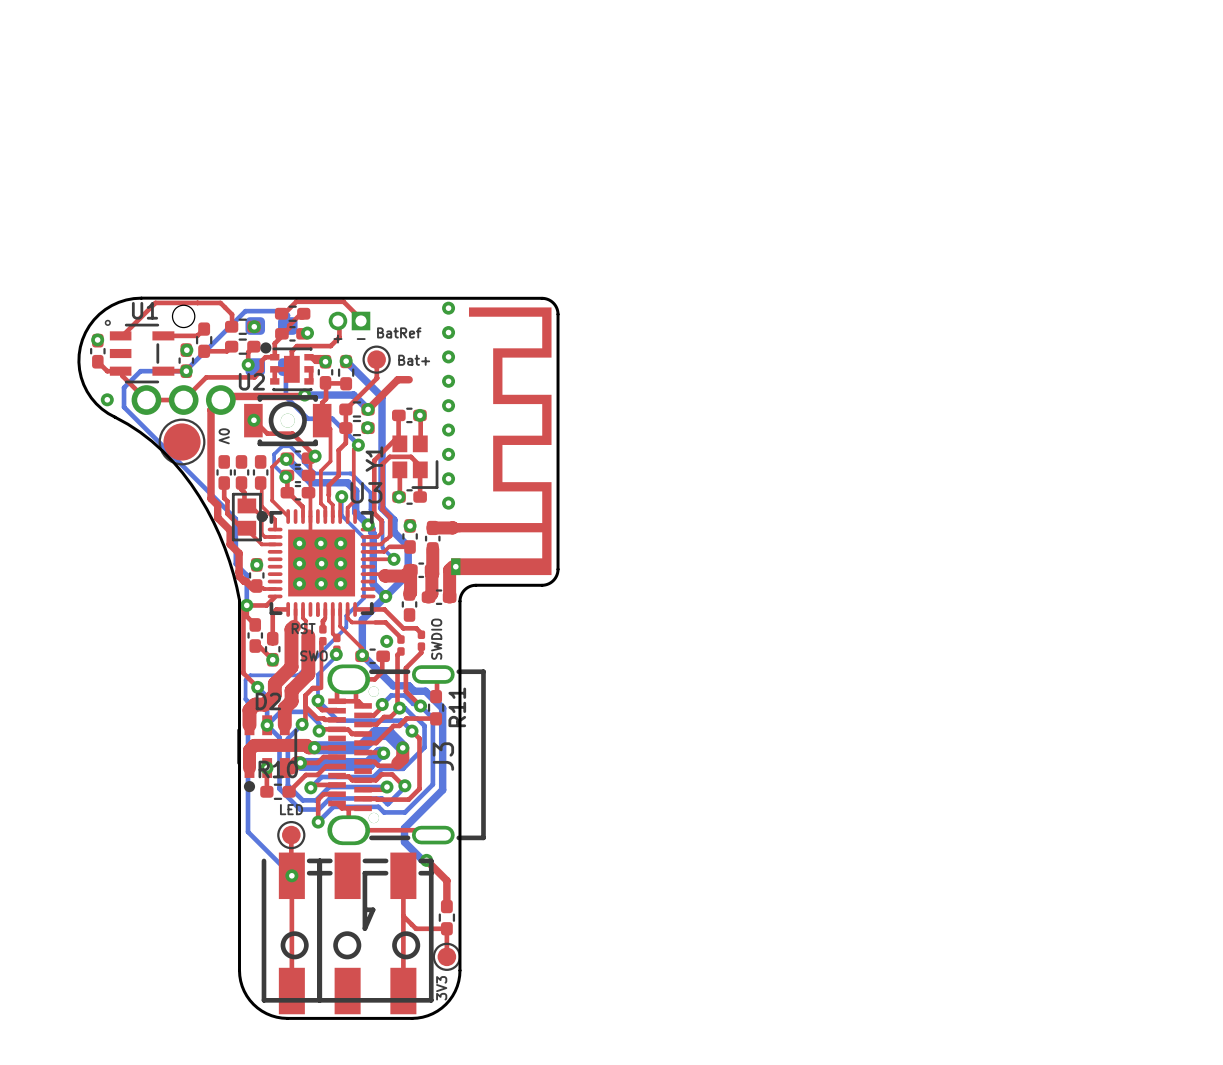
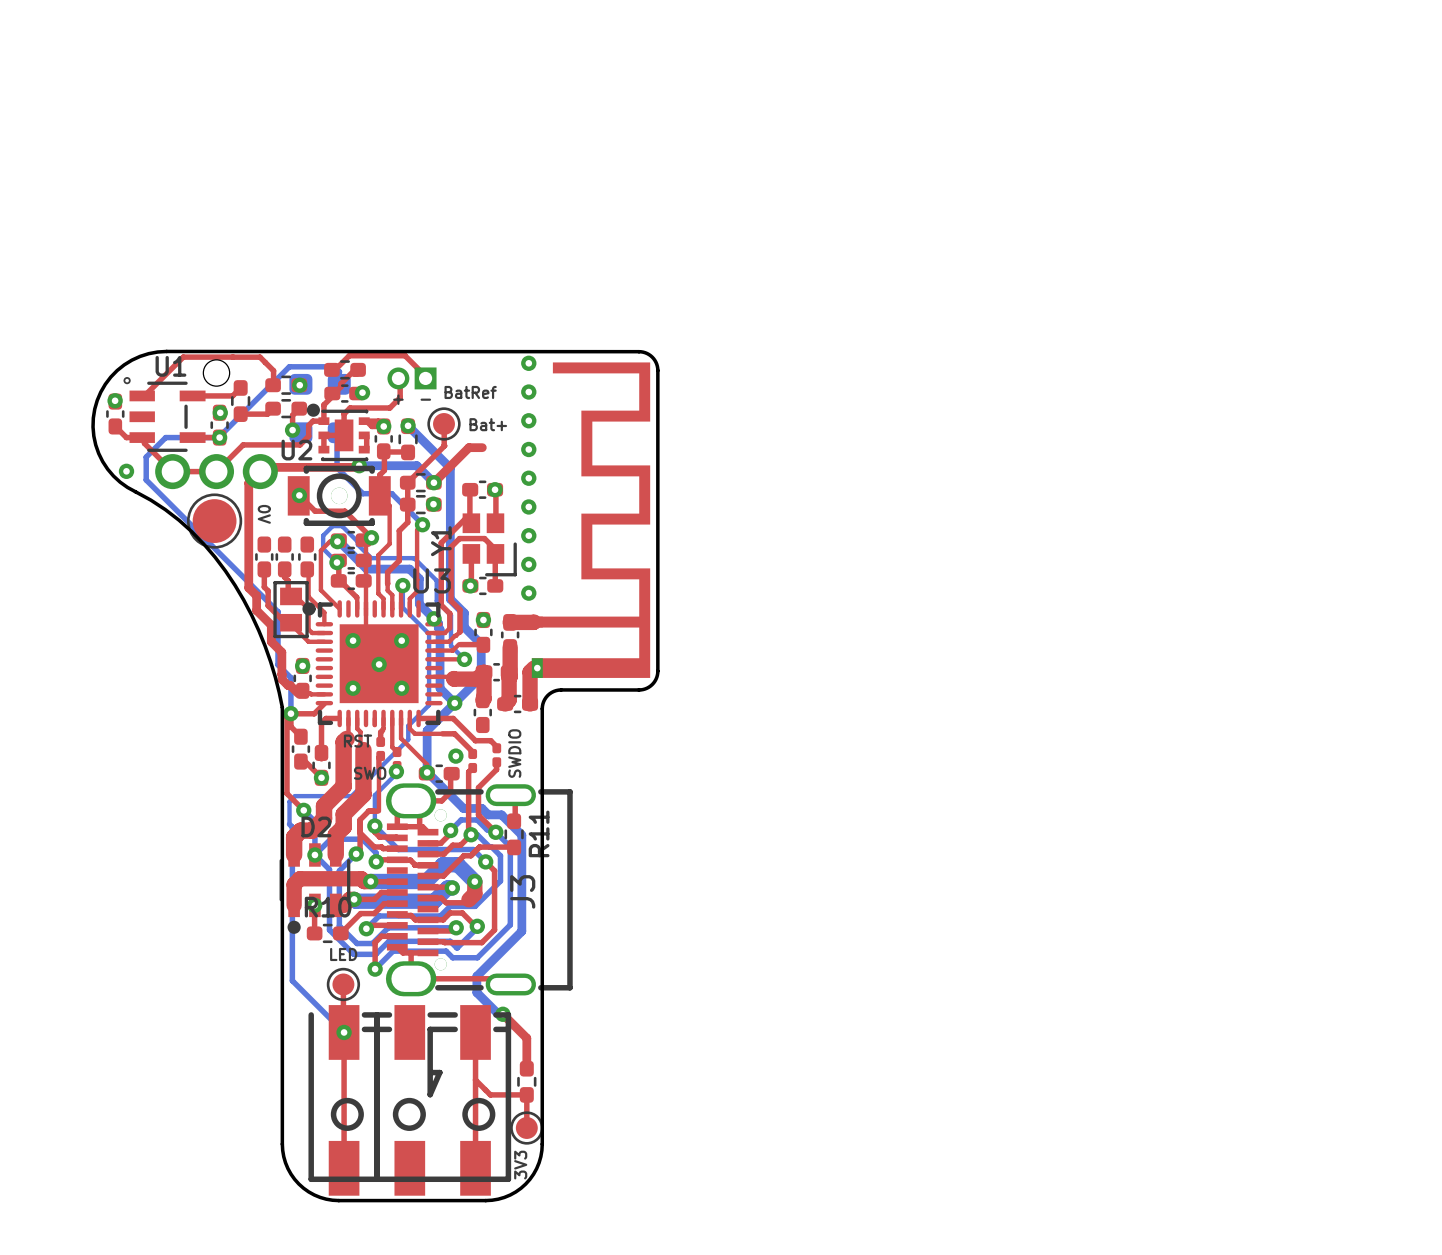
via: (320, 543) -> none
via: (299, 563) -> none
via: (340, 563) -> none
via: (321, 583) -> none

